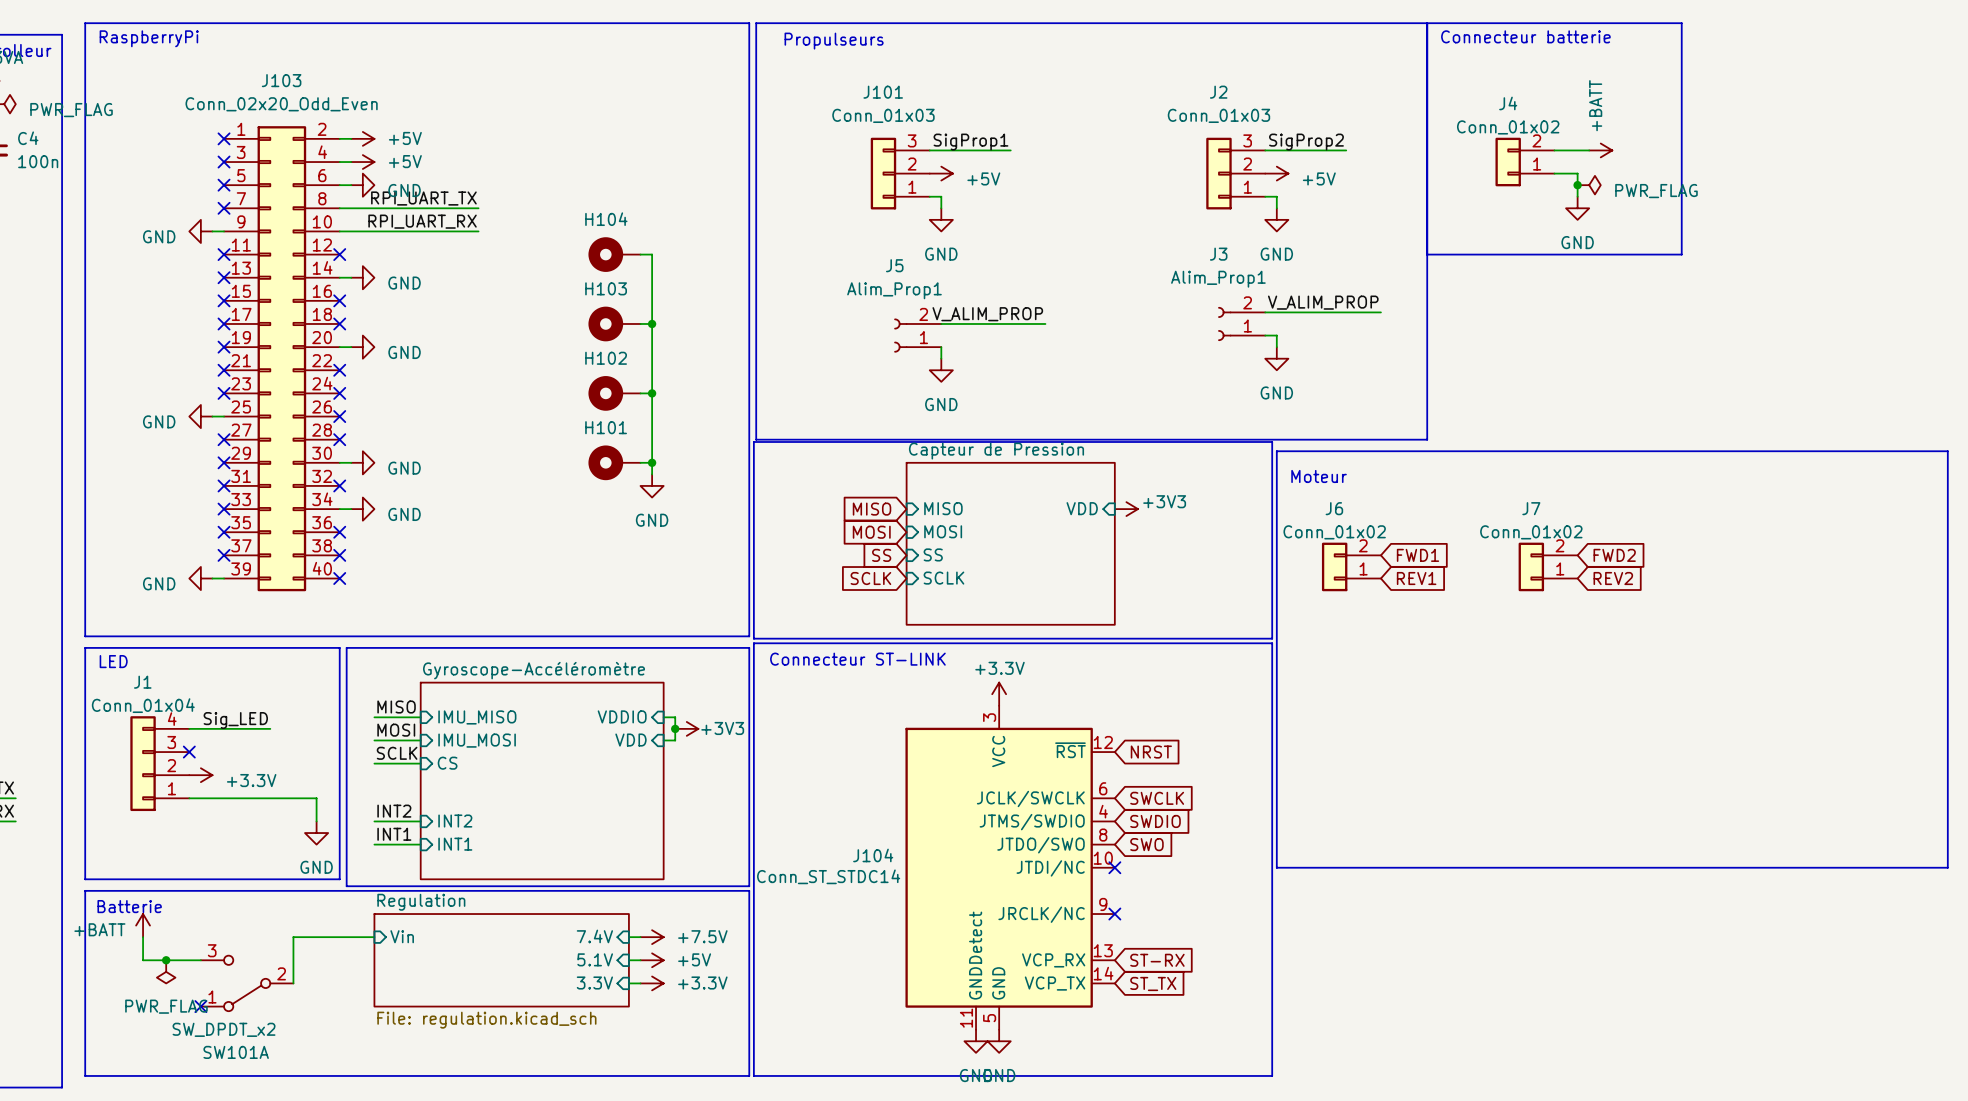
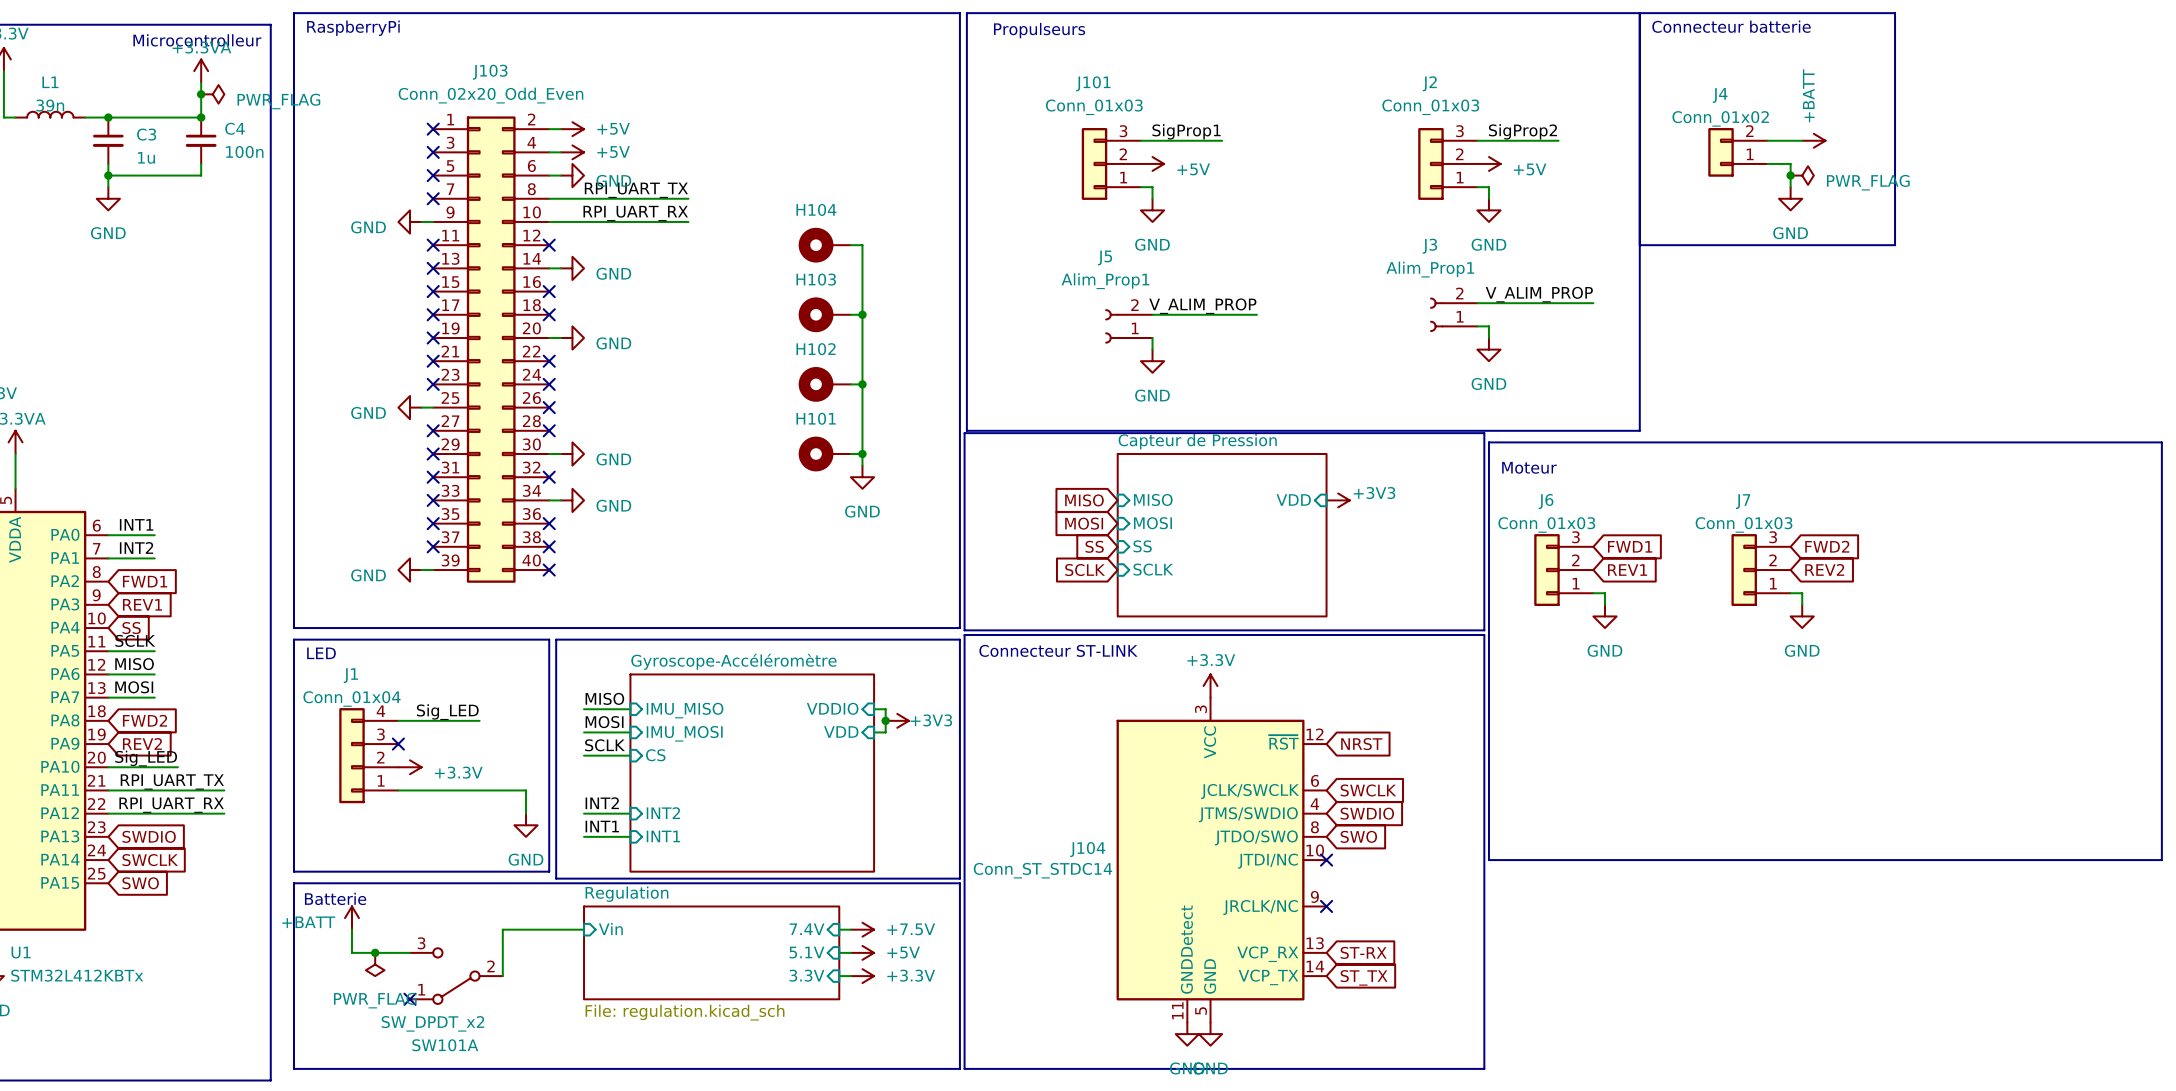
J6 value: Conn_01x02 (1334, 532) -> Conn_01x03 (1546, 524)
J7 value: Conn_01x02 (1531, 532) -> Conn_01x03 (1744, 524)
J6 symbol: [1321, 542, 1381, 592] -> [1534, 534, 1594, 606]
J7 symbol: [1518, 542, 1578, 592] -> [1731, 534, 1791, 606]
wire: none -> (1593, 593) (1604, 593) (1604, 604)
wire: none -> (1790, 593) (1802, 593) (1802, 604)
power symbol: none -> GND (1604, 616)
power symbol: none -> GND (1802, 616)

